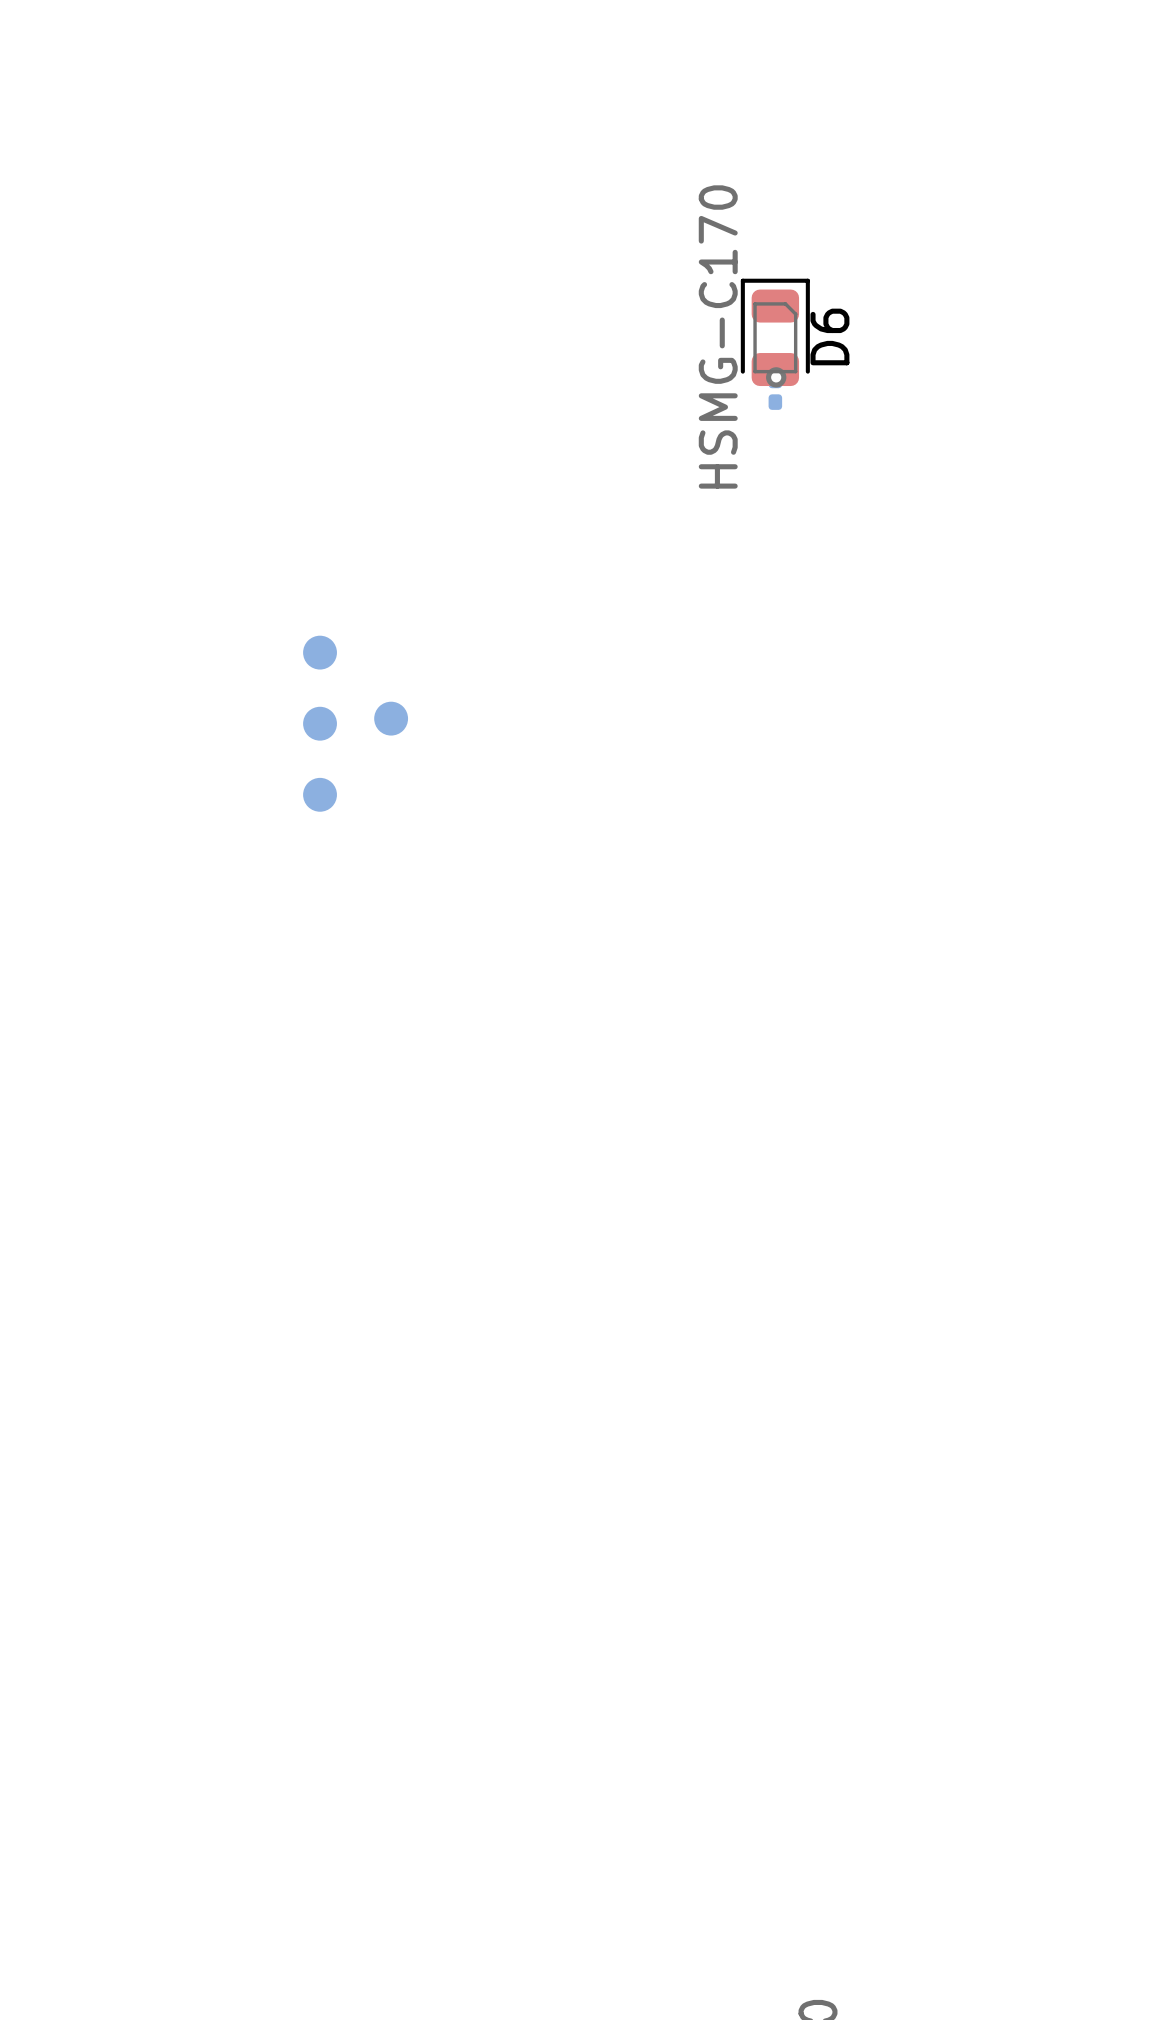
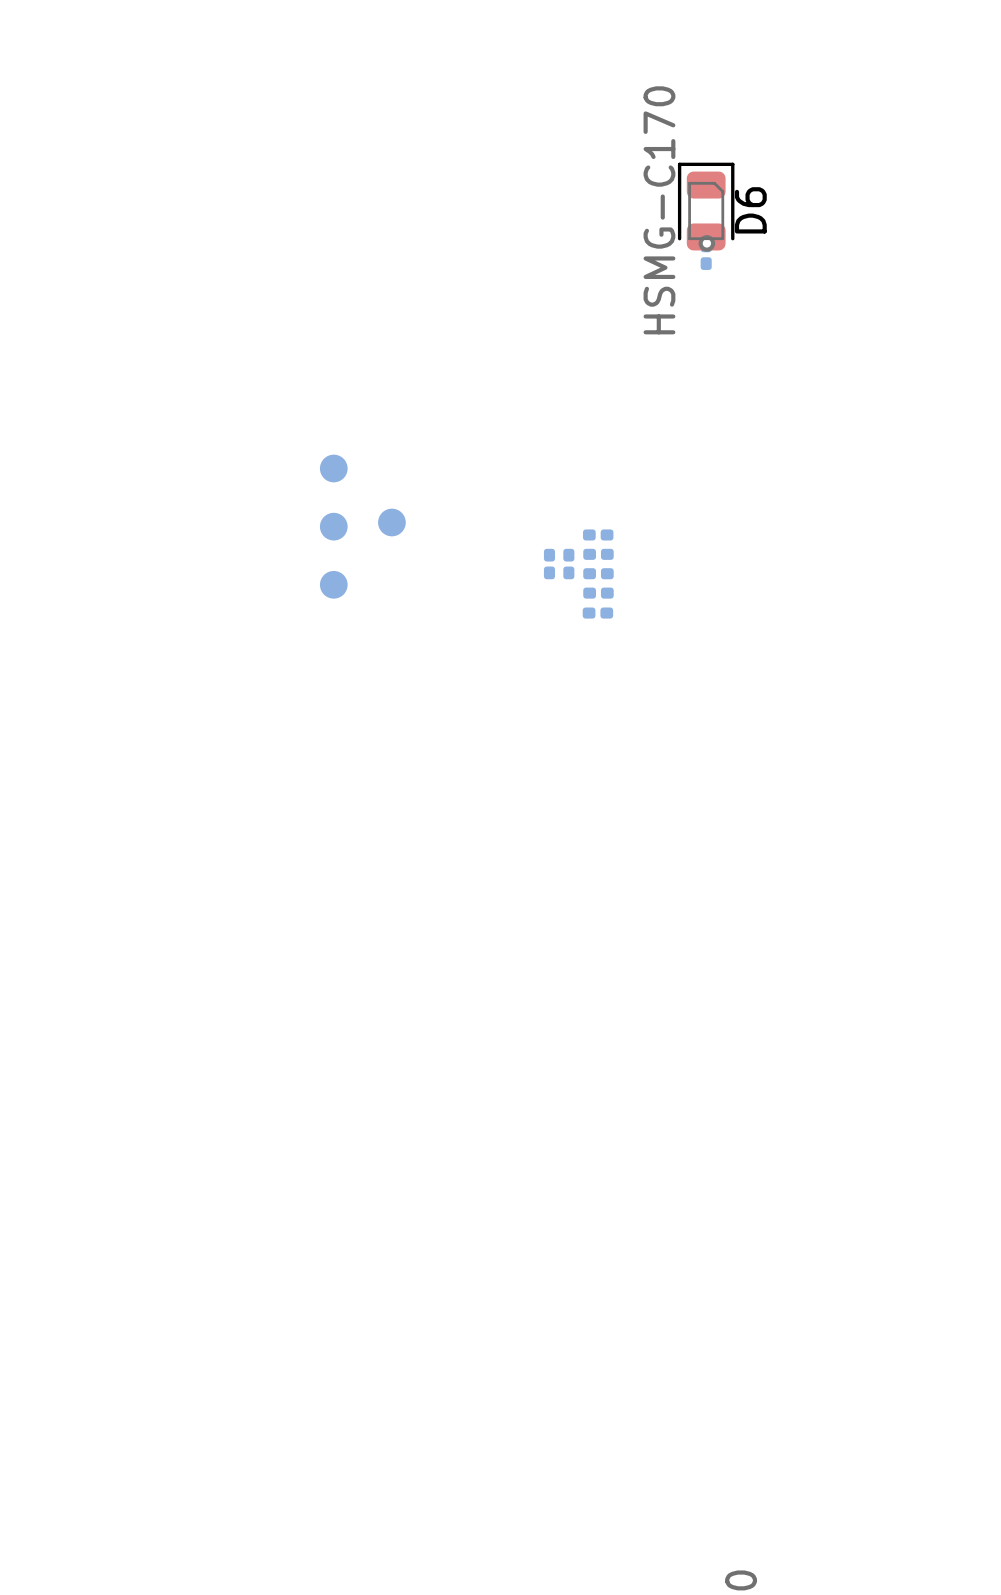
part: none -> (598, 534)
part: none -> (598, 554)
part: none -> (549, 564)
part: none -> (568, 564)
part: none -> (598, 573)
part: none -> (598, 593)
part: none -> (597, 613)

